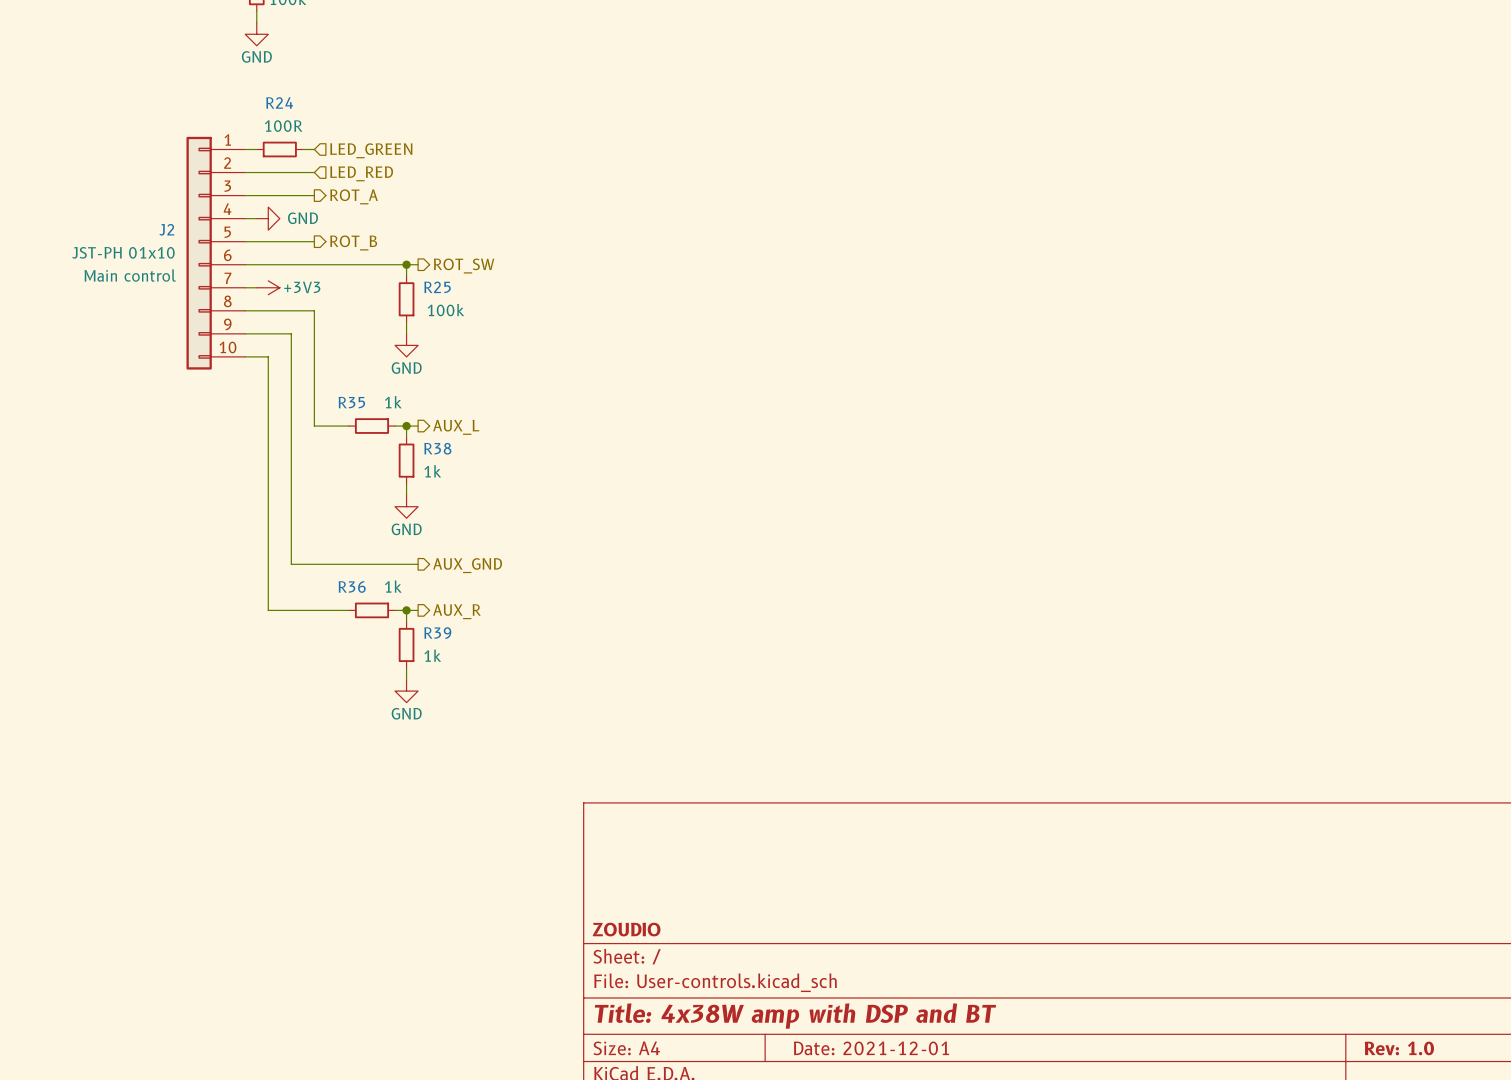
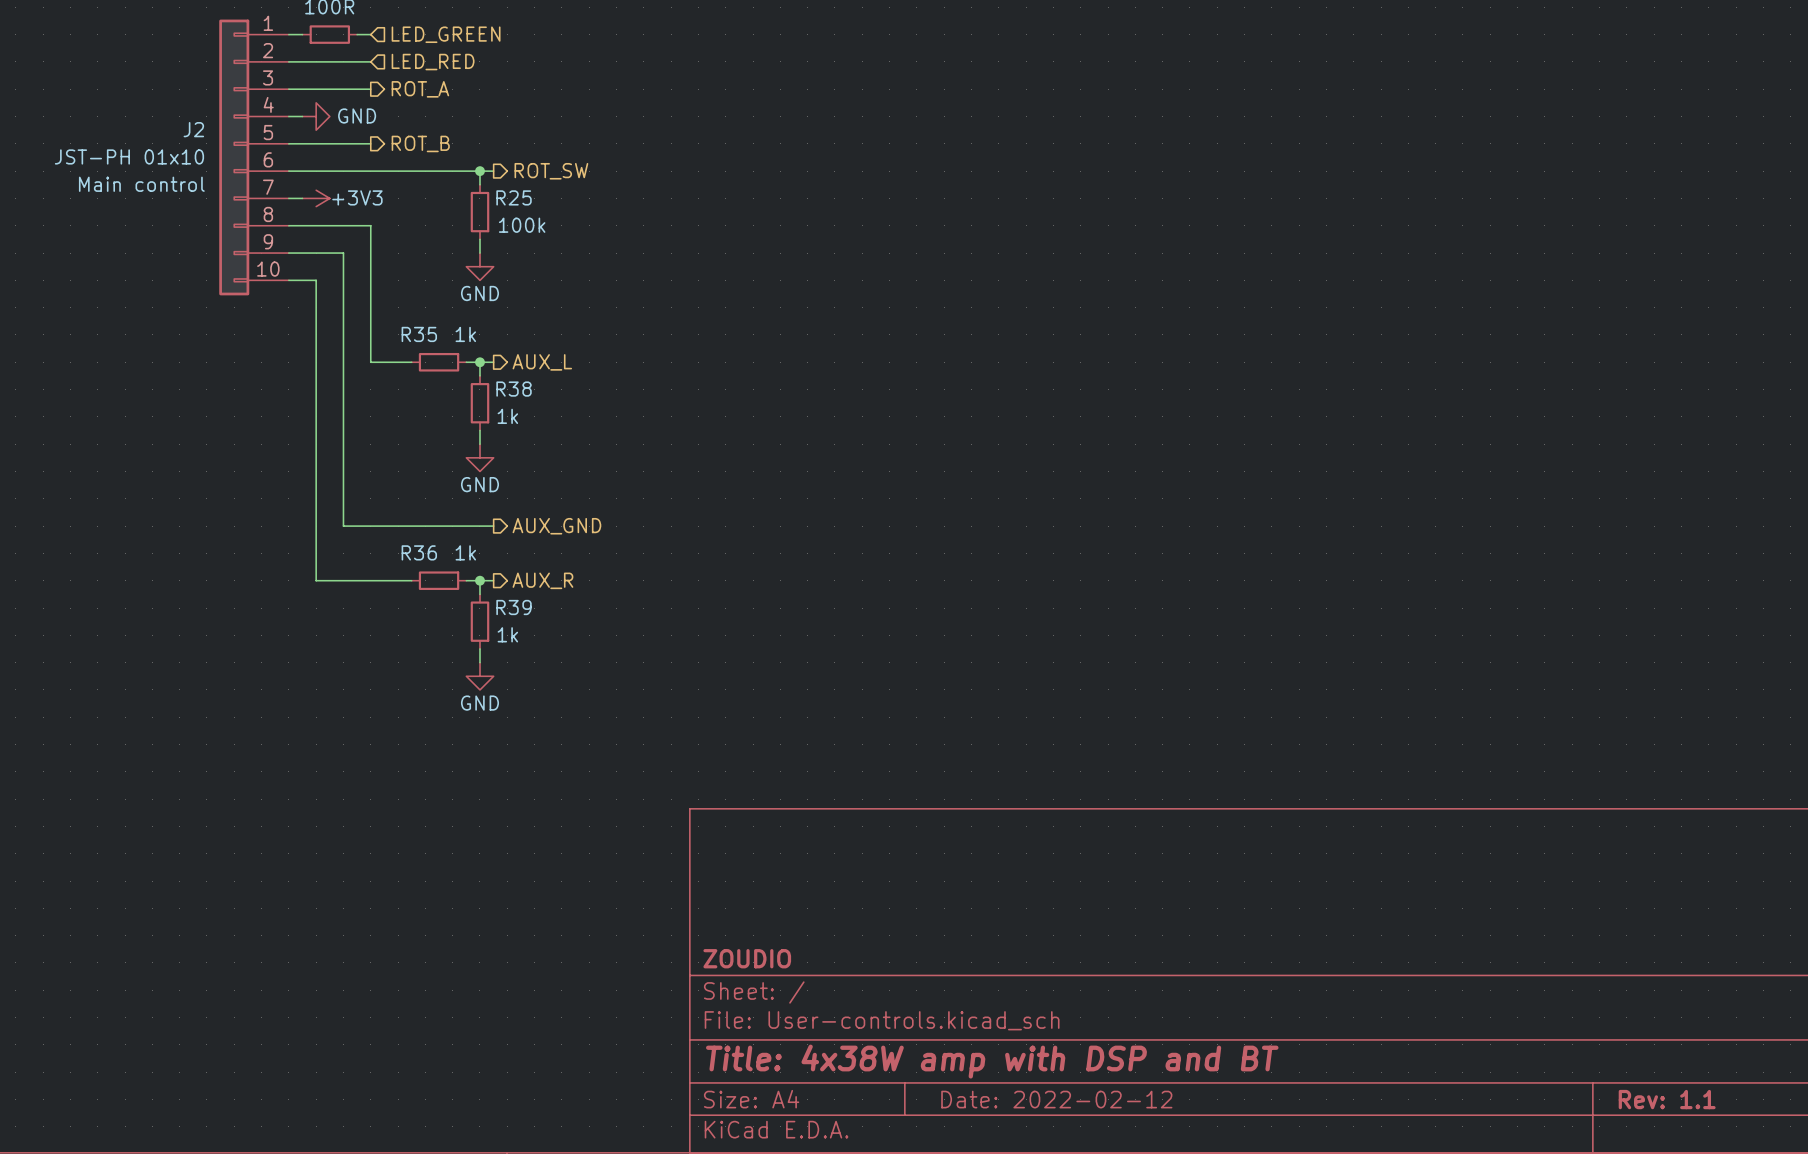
title block: Date: 2021-12-01 (871, 1048) -> Date: 2022-02-12 (1056, 1099)
title block: Rev: 1.0 (1399, 1048) -> Rev: 1.1 (1667, 1099)

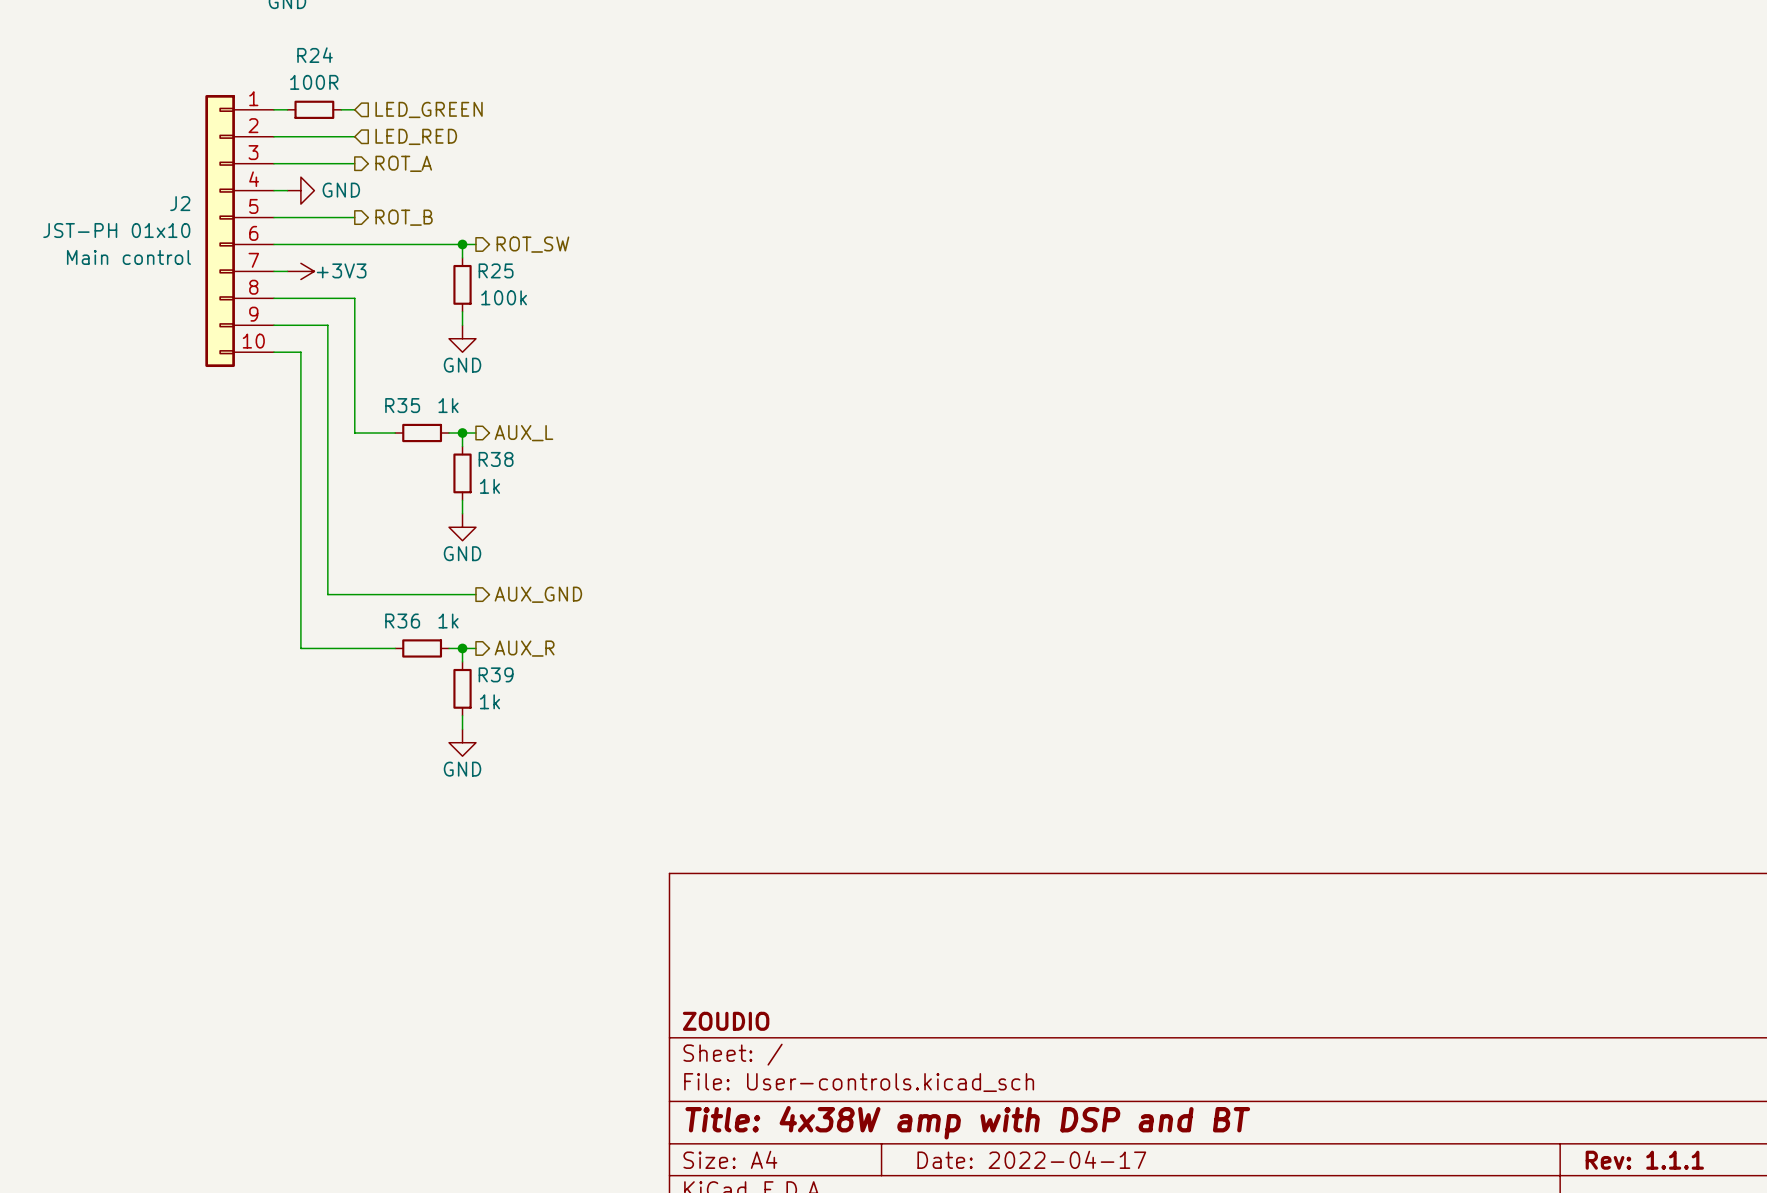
title block: Date: 2022-02-12 (1056, 1099) -> Date: 2022-04-17 (1031, 1159)
title block: Rev: 1.1 (1667, 1099) -> Rev: 1.1.1 (1644, 1160)

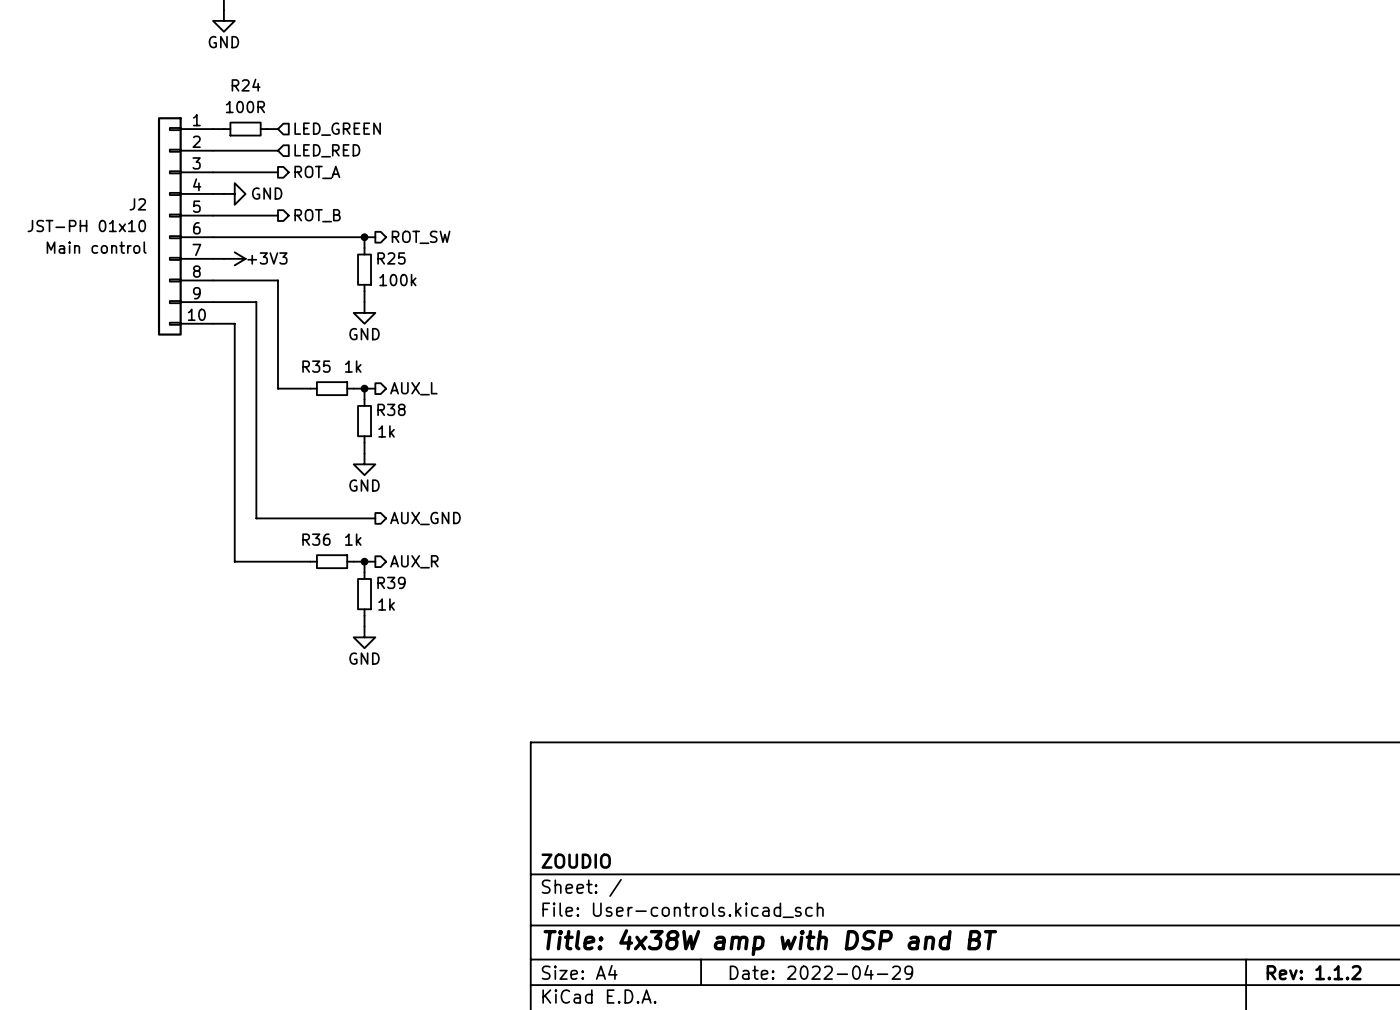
title block: Date: 2022-04-17 (1031, 1159) -> Date: 2022-04-29 (821, 972)
title block: Rev: 1.1.1 (1644, 1160) -> Rev: 1.1.2 (1314, 972)

